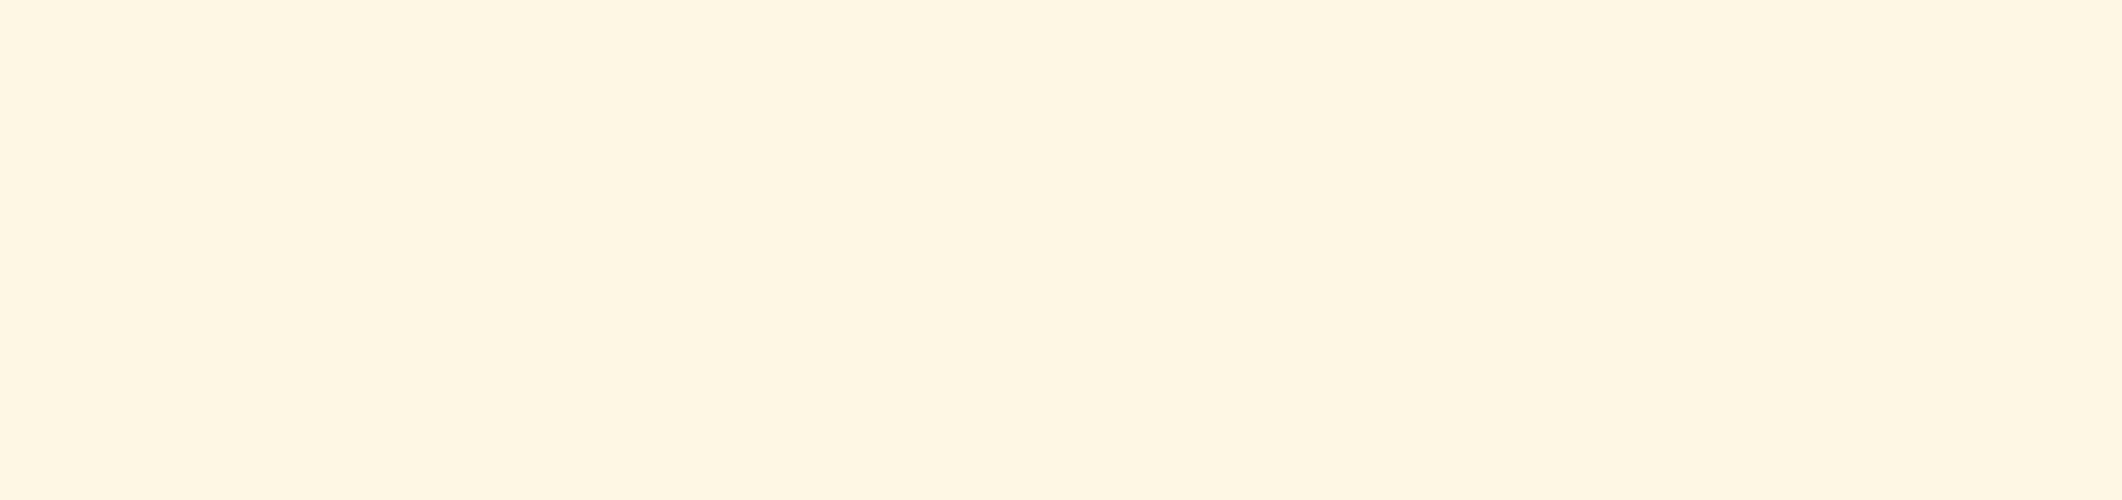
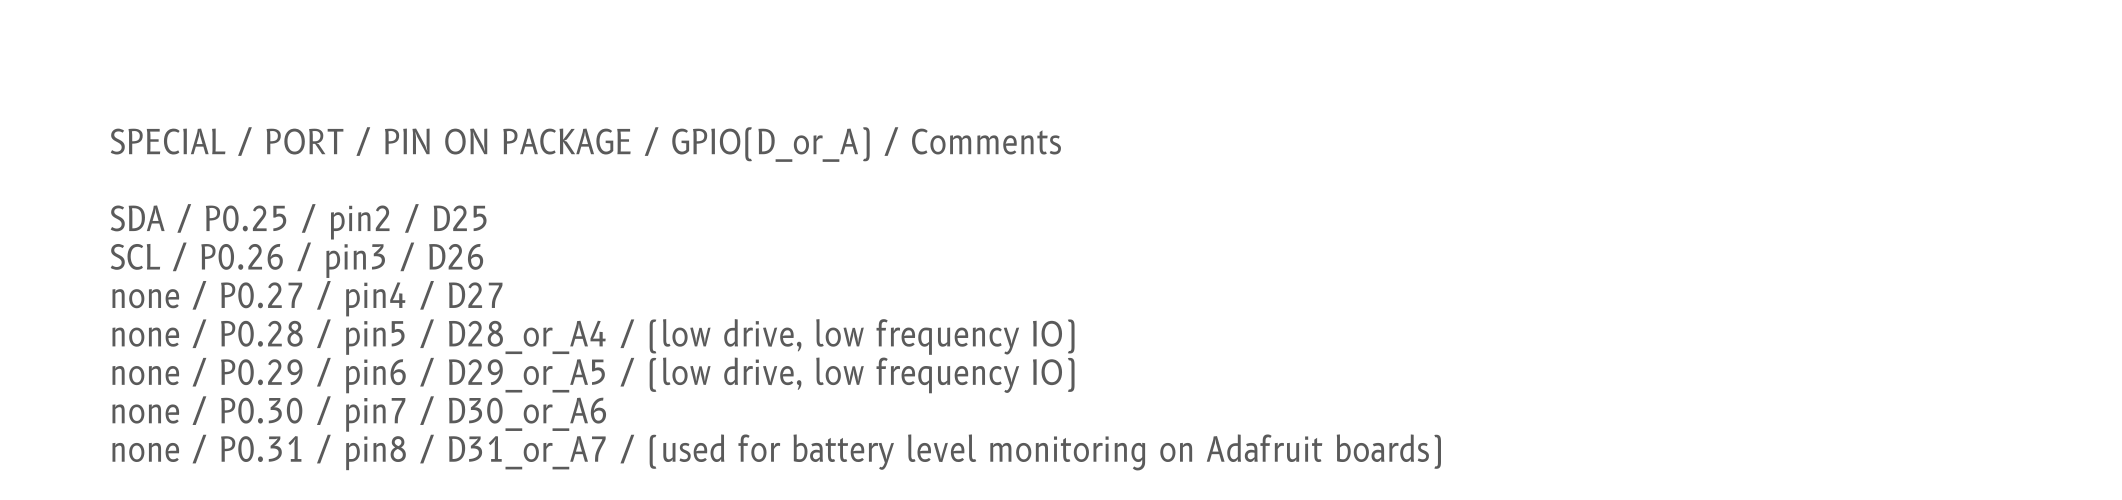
text: none -> SPECIAL / PORT / PIN ON PACKAGE / GPIO(D_or_A) / Comments (585, 144)
text: none -> SDA / P0.25 / pin2 / D25 (298, 221)
text: none -> SCL / P0.26 / pin3 / D26 (296, 260)
text: none -> none / P0.27 / pin4 / D27 (307, 298)
text: none -> none / P0.28 / pin5 / D28_or_A4 / (low drive, low frequency IO) (593, 336)
text: none -> none / P0.29 / pin6 / D29_or_A5 / (low drive, low frequency IO) (593, 375)
text: none -> none / P0.30 / pin7 / D30_or_A6 (359, 414)
text: none -> none / P0.31 / pin8 / D31_or_A7 / (used for battery level monitoring on Adafruit boards) (776, 452)

